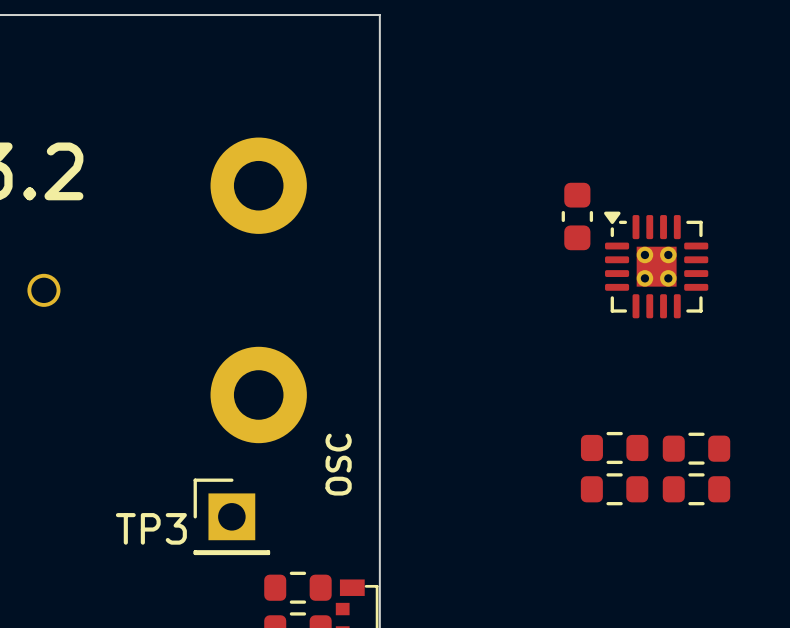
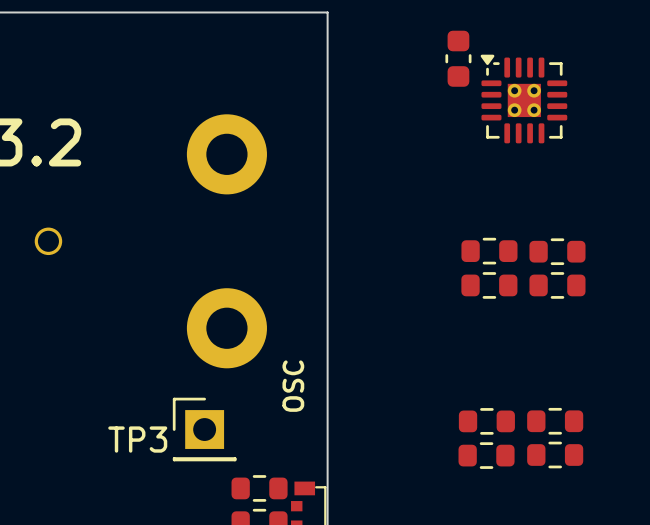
part position: (577, 216) -> (458, 58)
part position: (656, 264) -> (523, 99)
part: none -> (489, 251)
part: none -> (557, 251)
part: none -> (489, 285)
part: none -> (557, 285)
part: (614, 447) -> none
part: (696, 448) -> none
part: (614, 489) -> none
part: (696, 489) -> none
part: none -> (555, 421)
part: none -> (486, 421)
part: none -> (555, 455)
part: none -> (486, 455)

